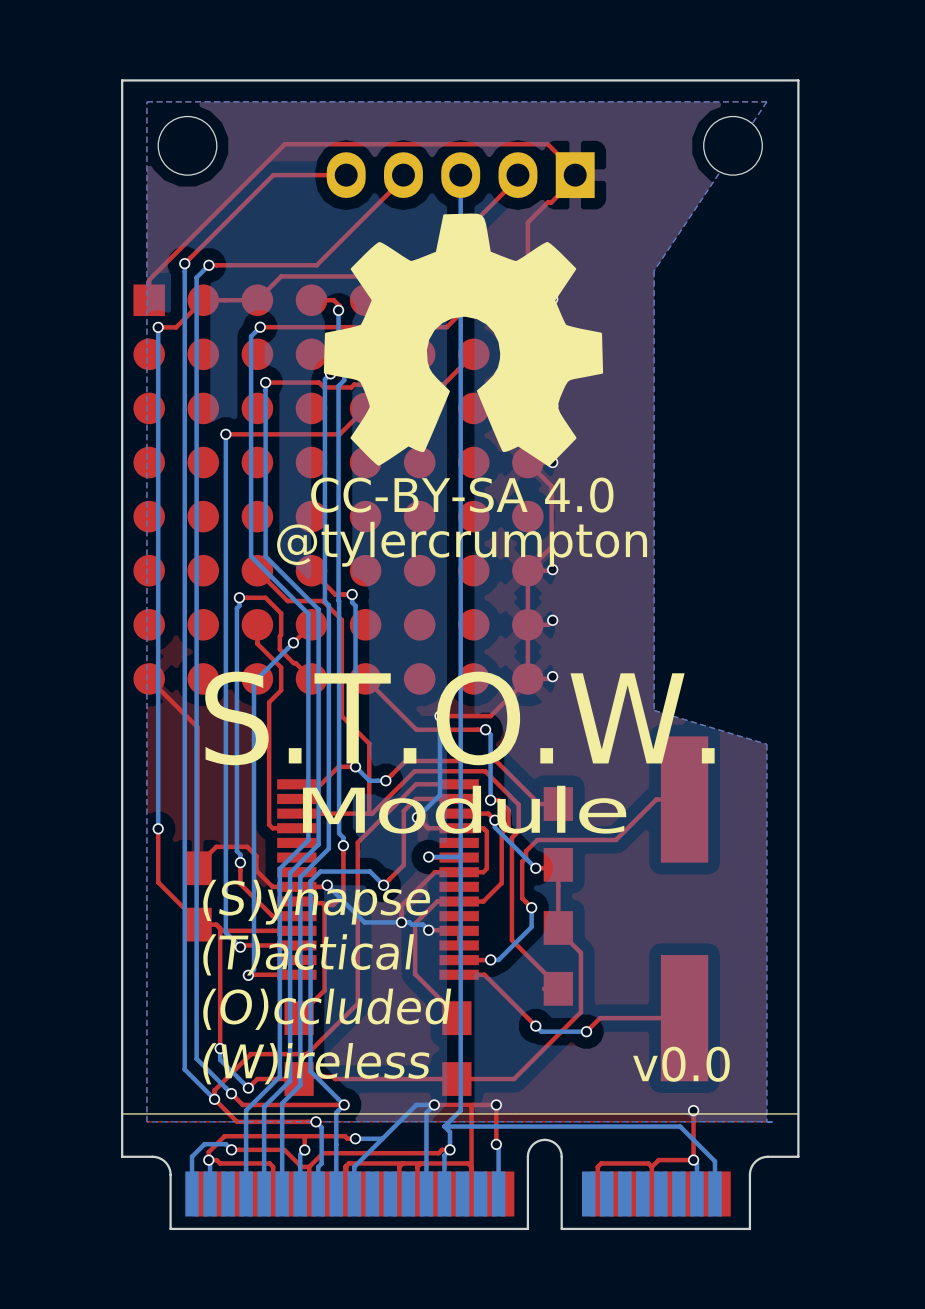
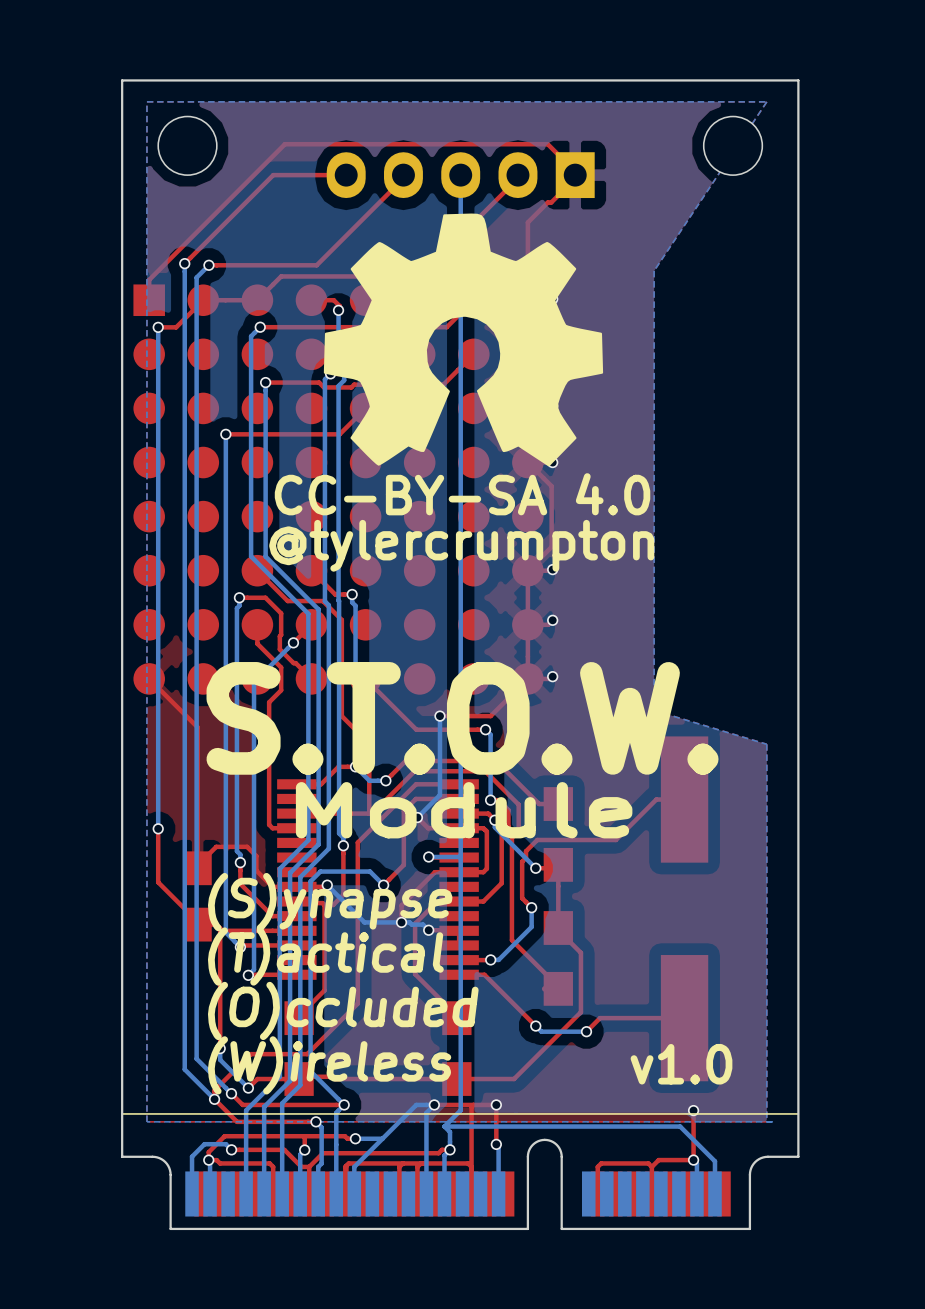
text: v0.0 (681, 1064) -> v1.0 (681, 1064)

